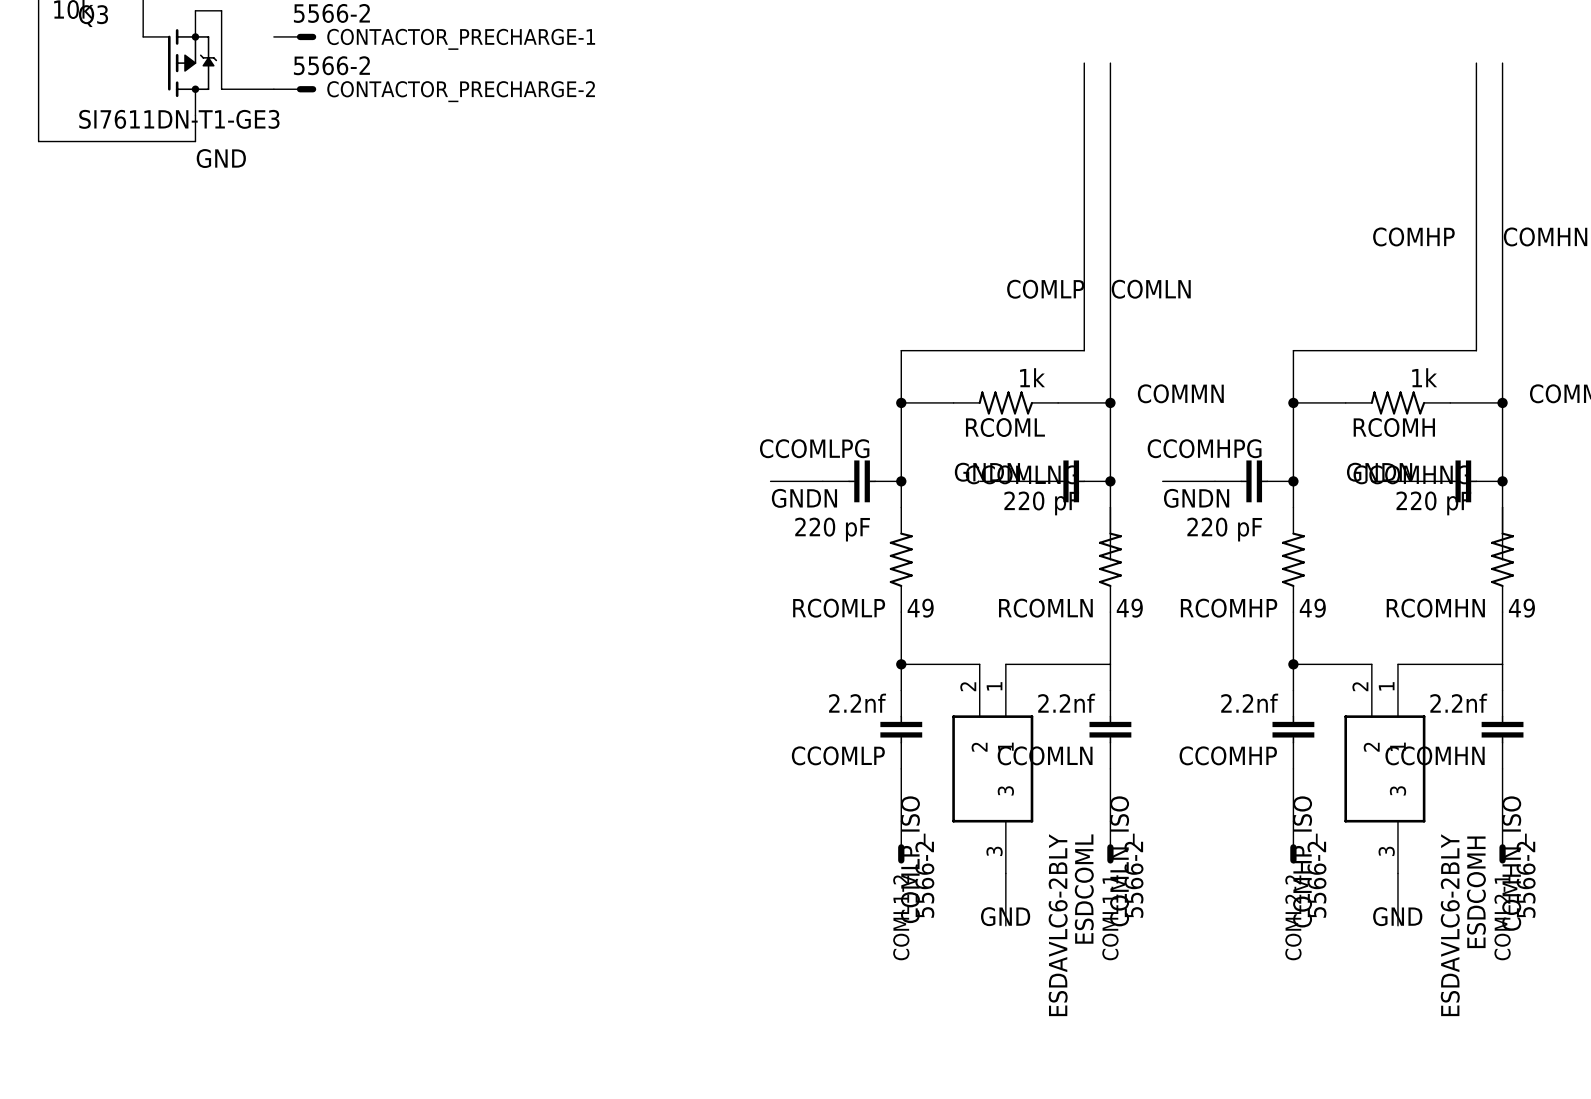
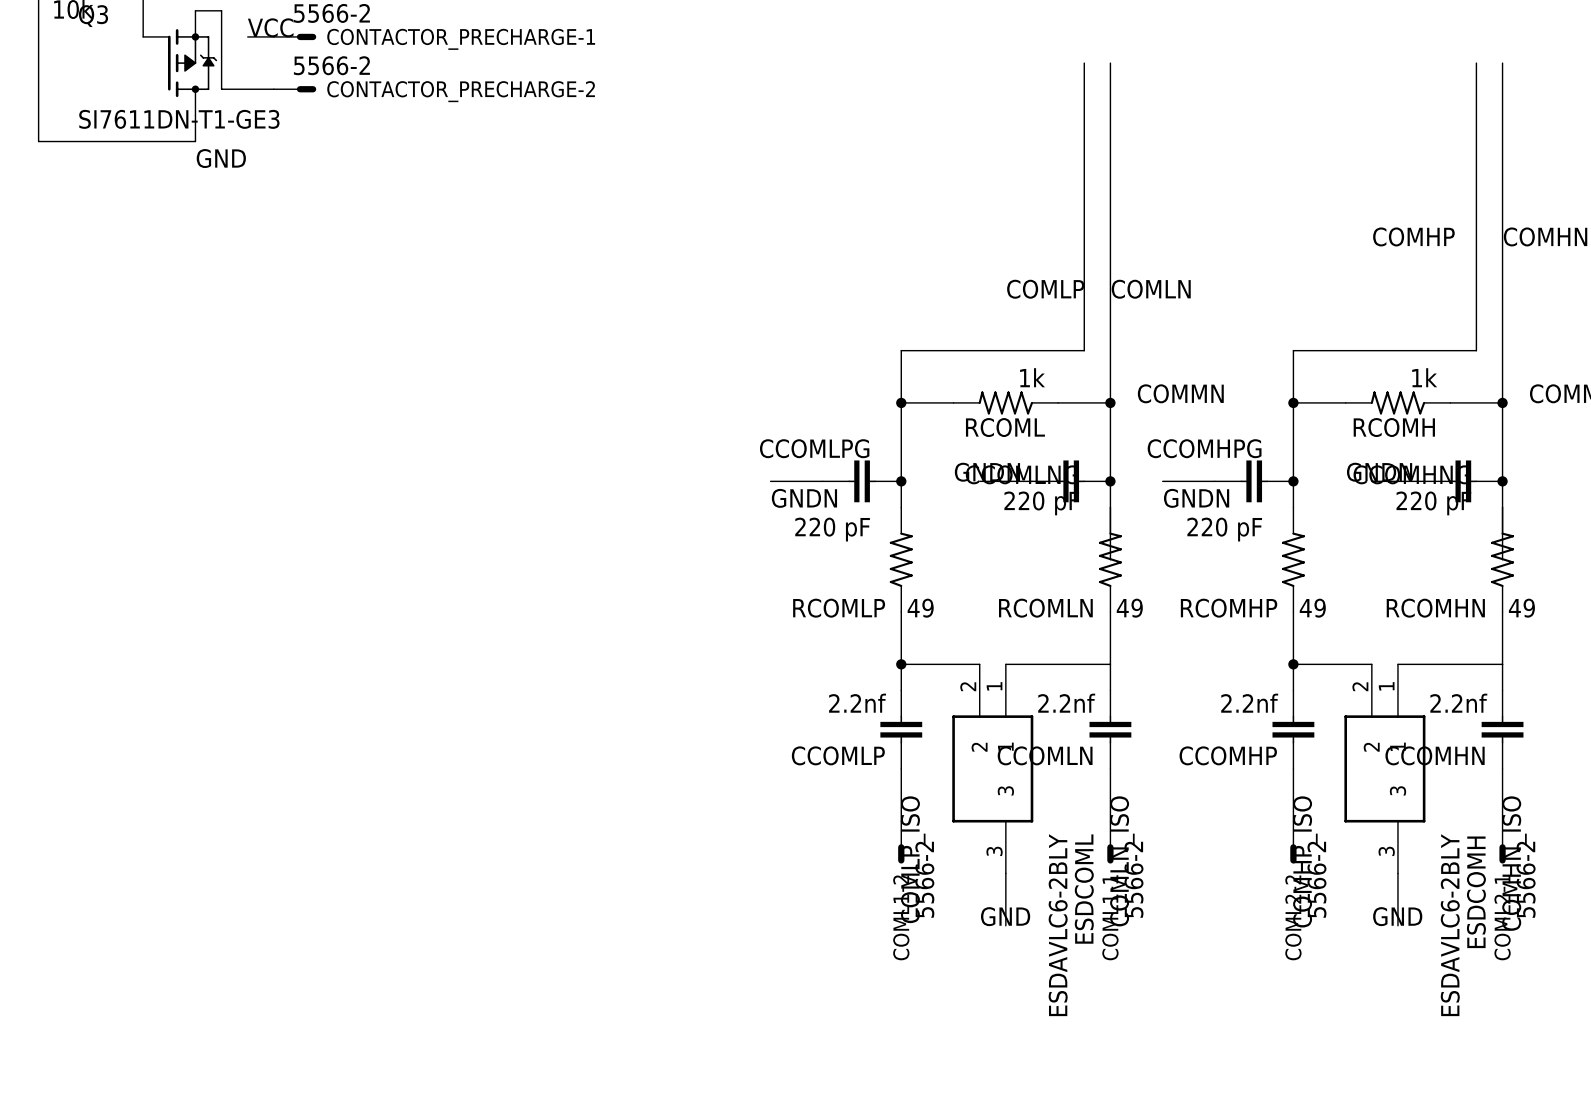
label: none -> VCC (270, 27)
wire: none -> (247, 36) (273, 36)

